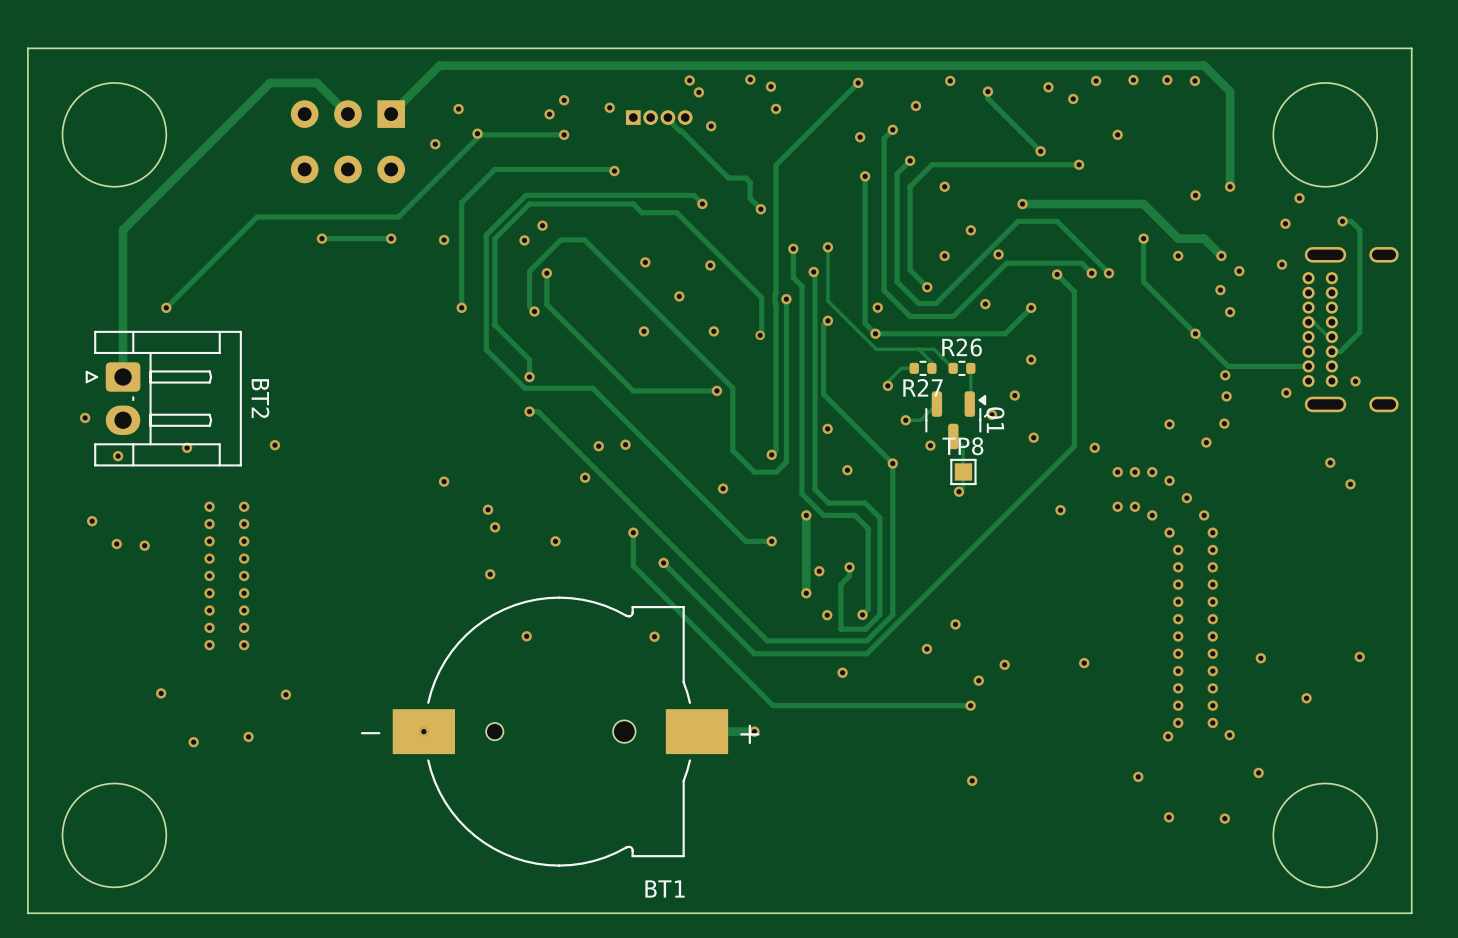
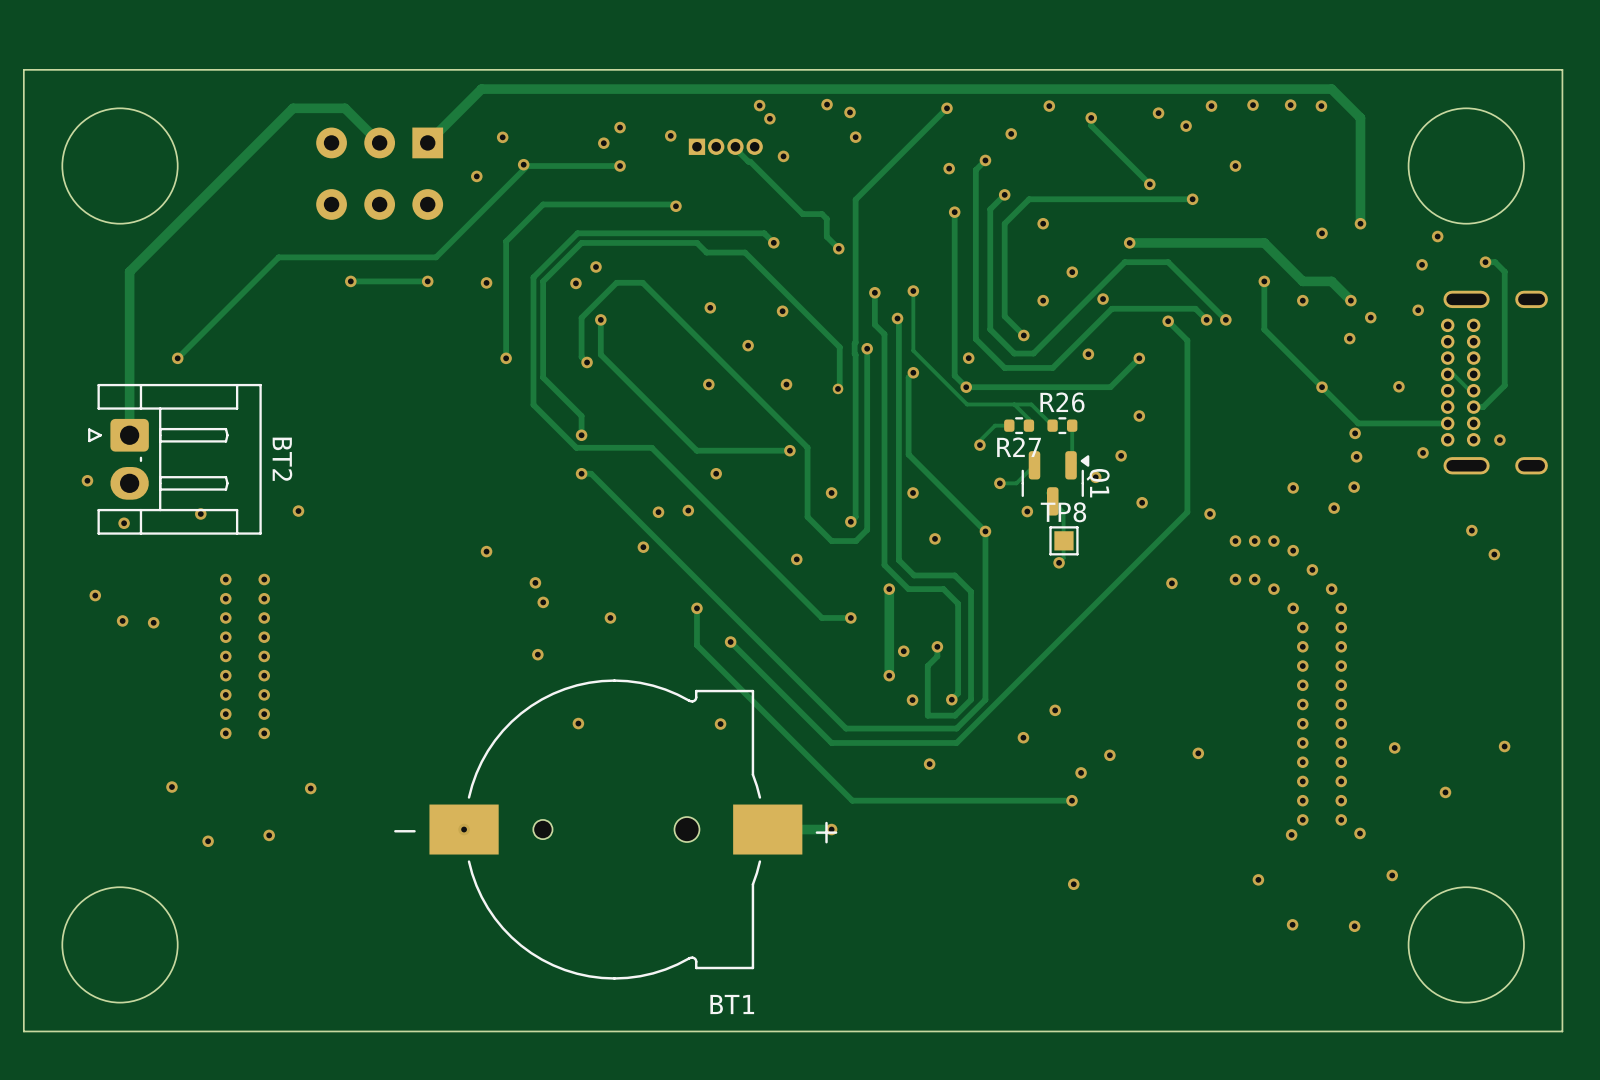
via position: (1230, 312) -> (1398, 386)
via: none -> (716, 473)
via: none -> (831, 492)

